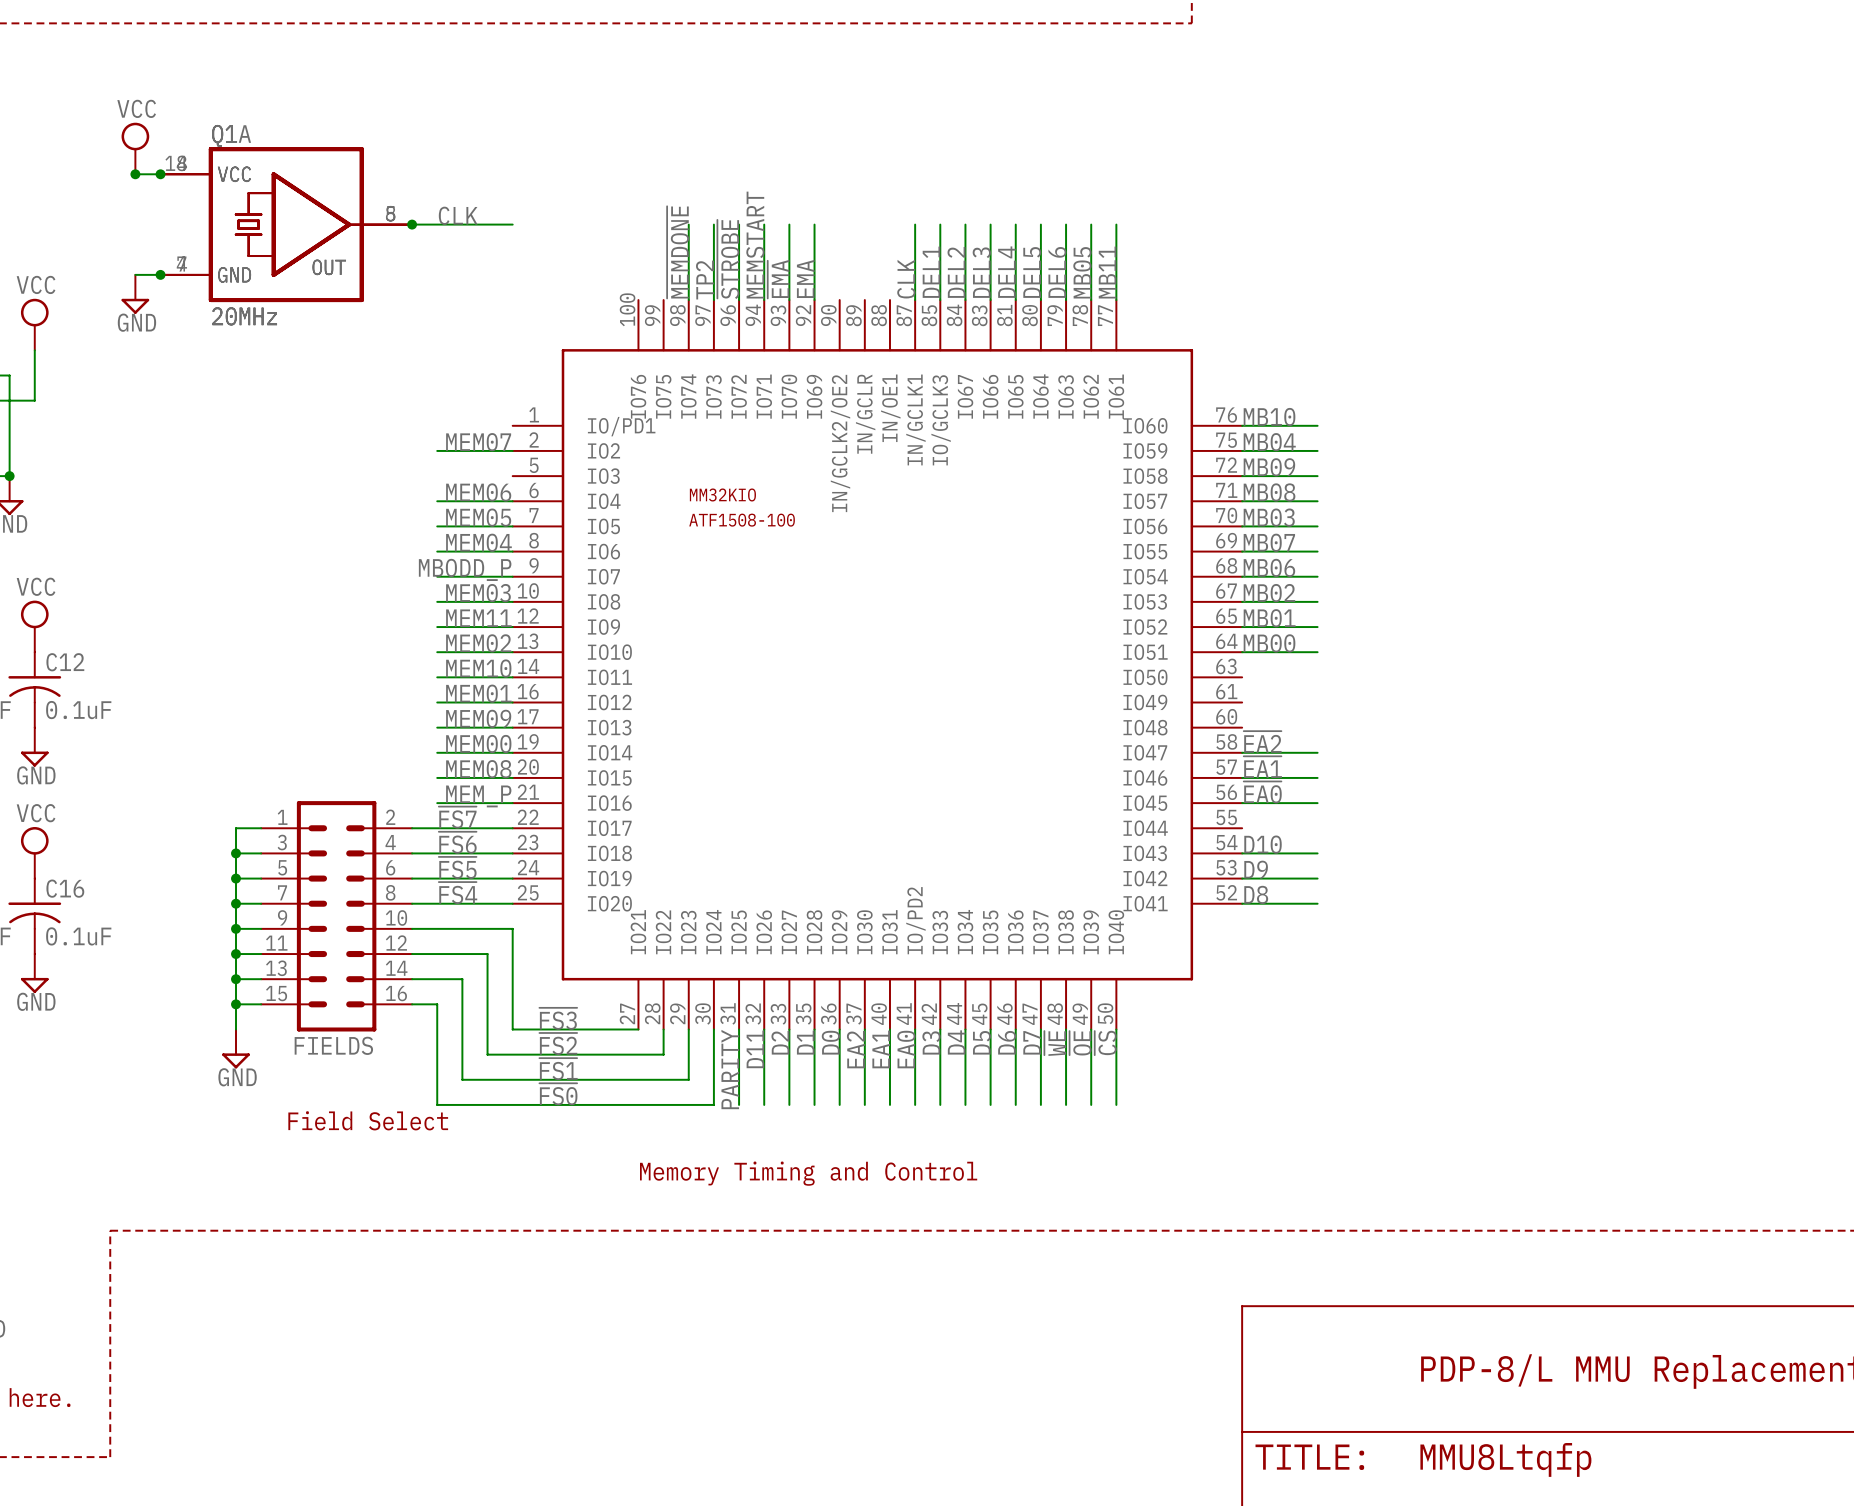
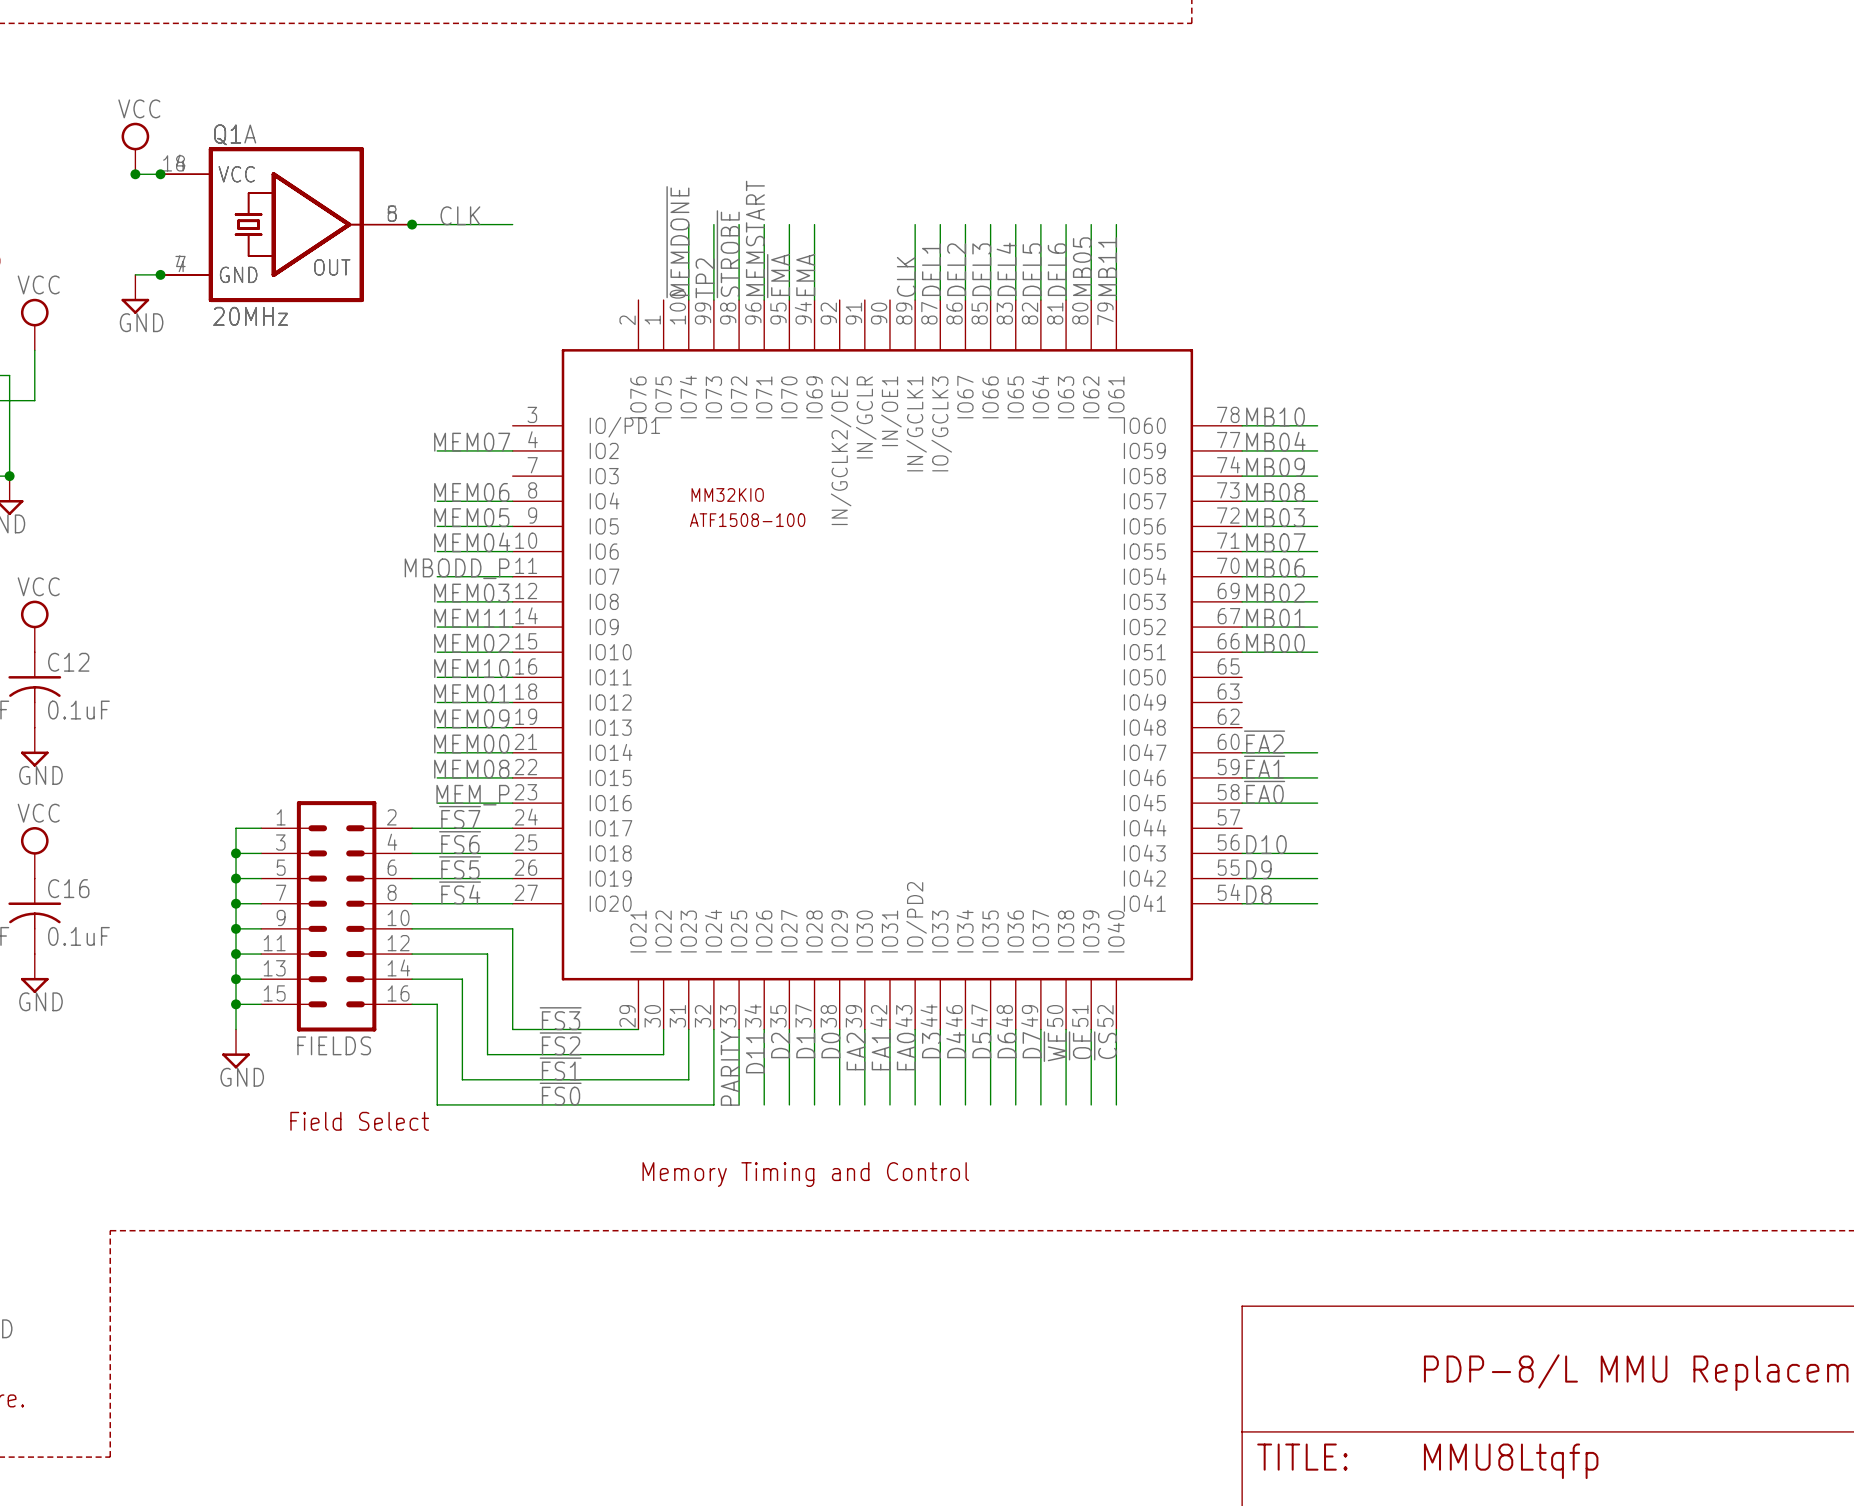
MM32KIO symbol: [512, 300, 1243, 1030] -> [512, 300, 1243, 1030]

